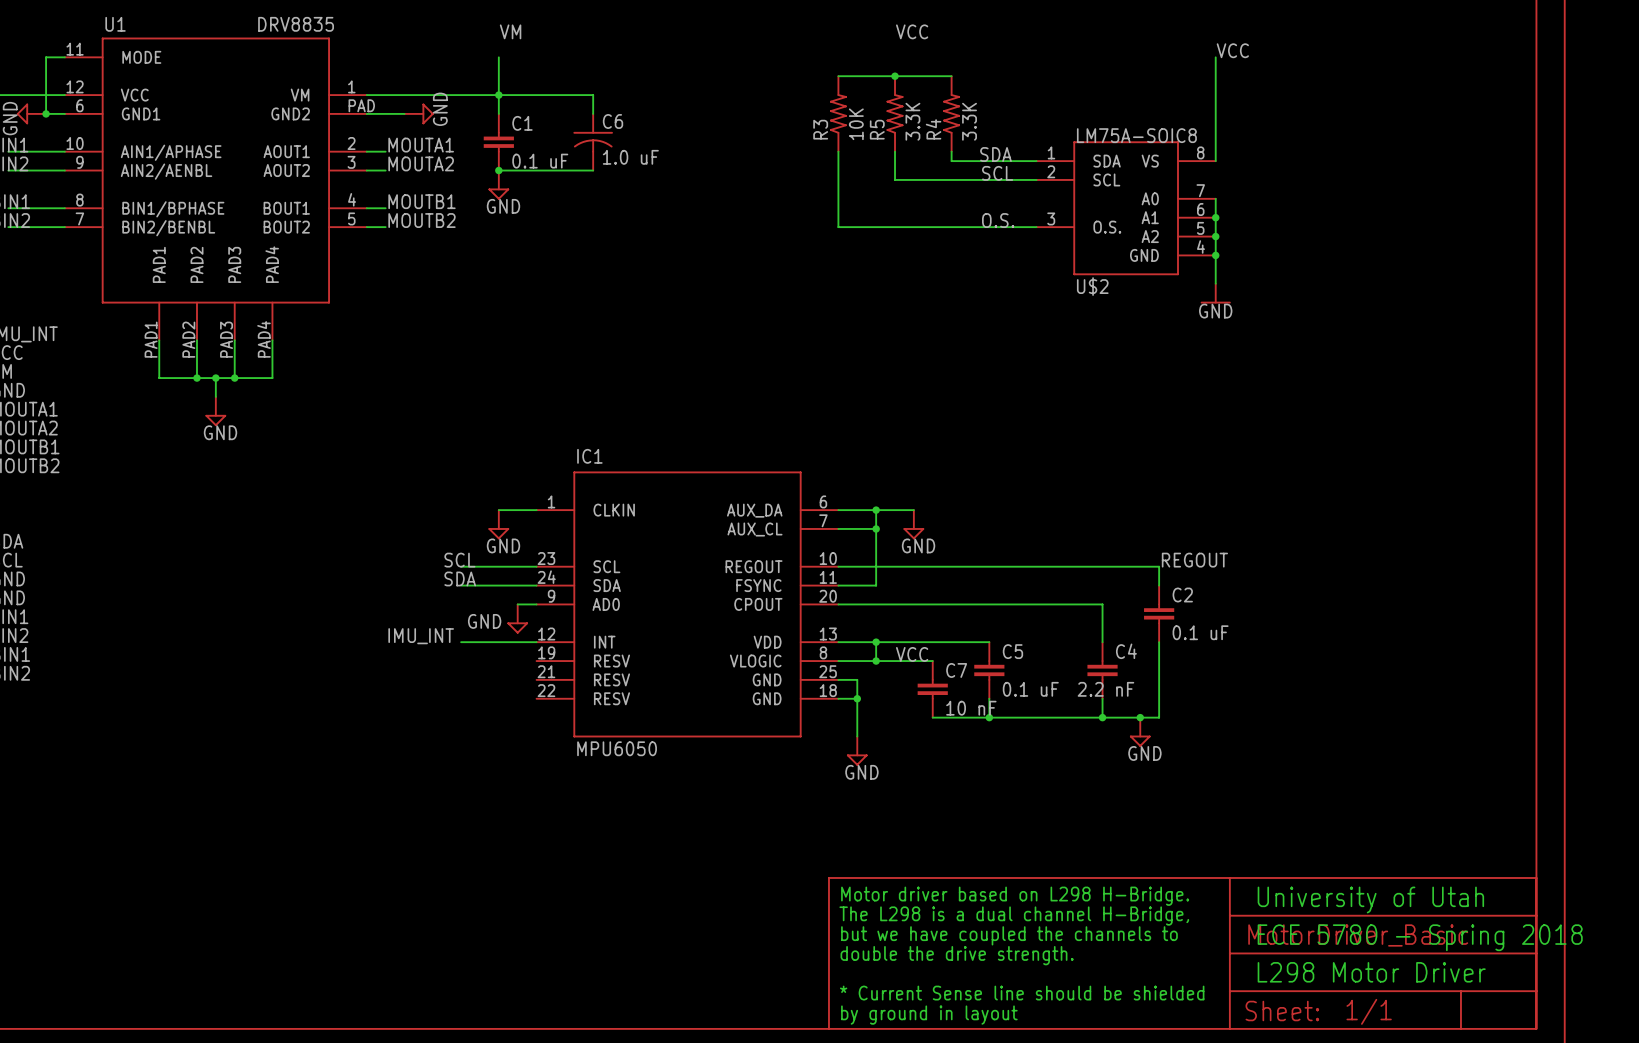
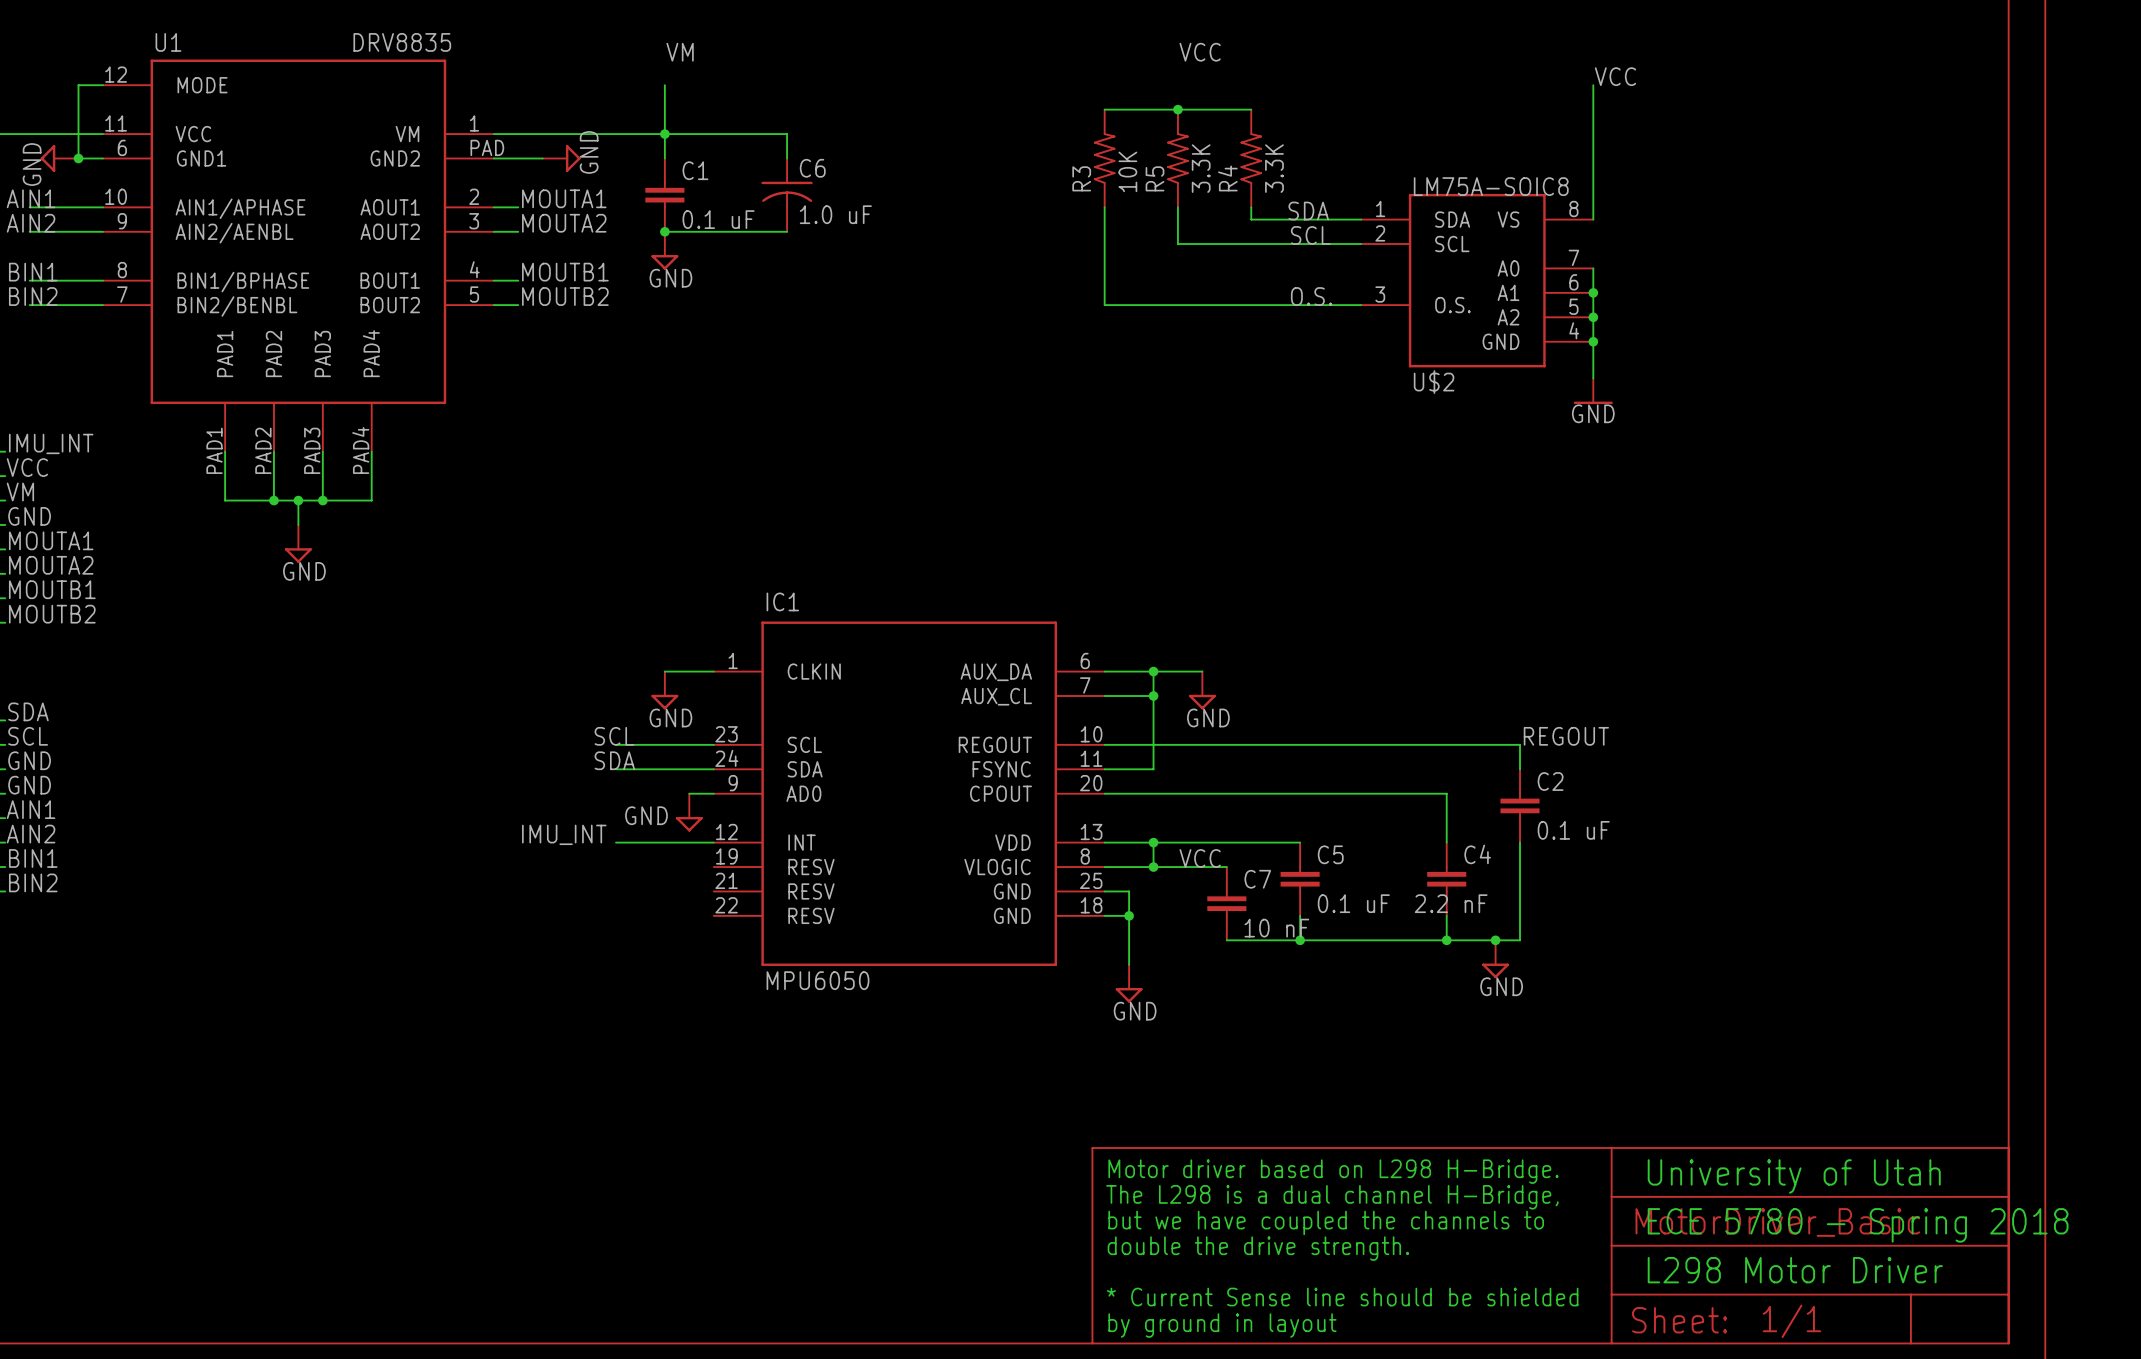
U1 pin number: 11 (75, 49) -> 12 (116, 74)
U1 pin number: 12 (75, 86) -> 11 (116, 123)

